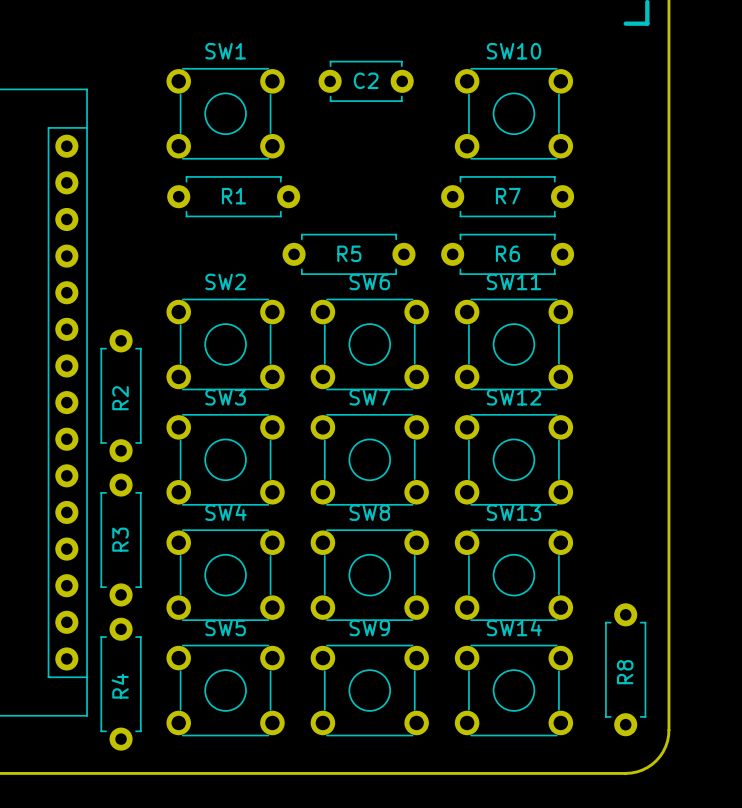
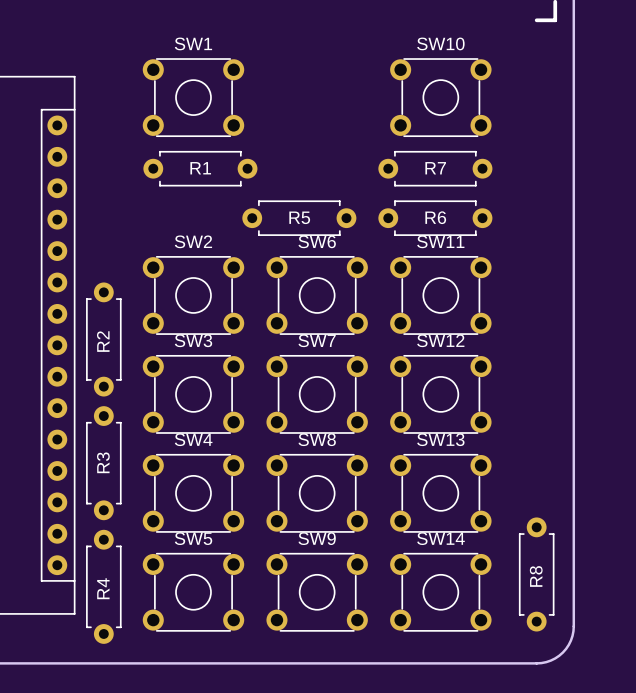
C2: (366, 81) -> none

